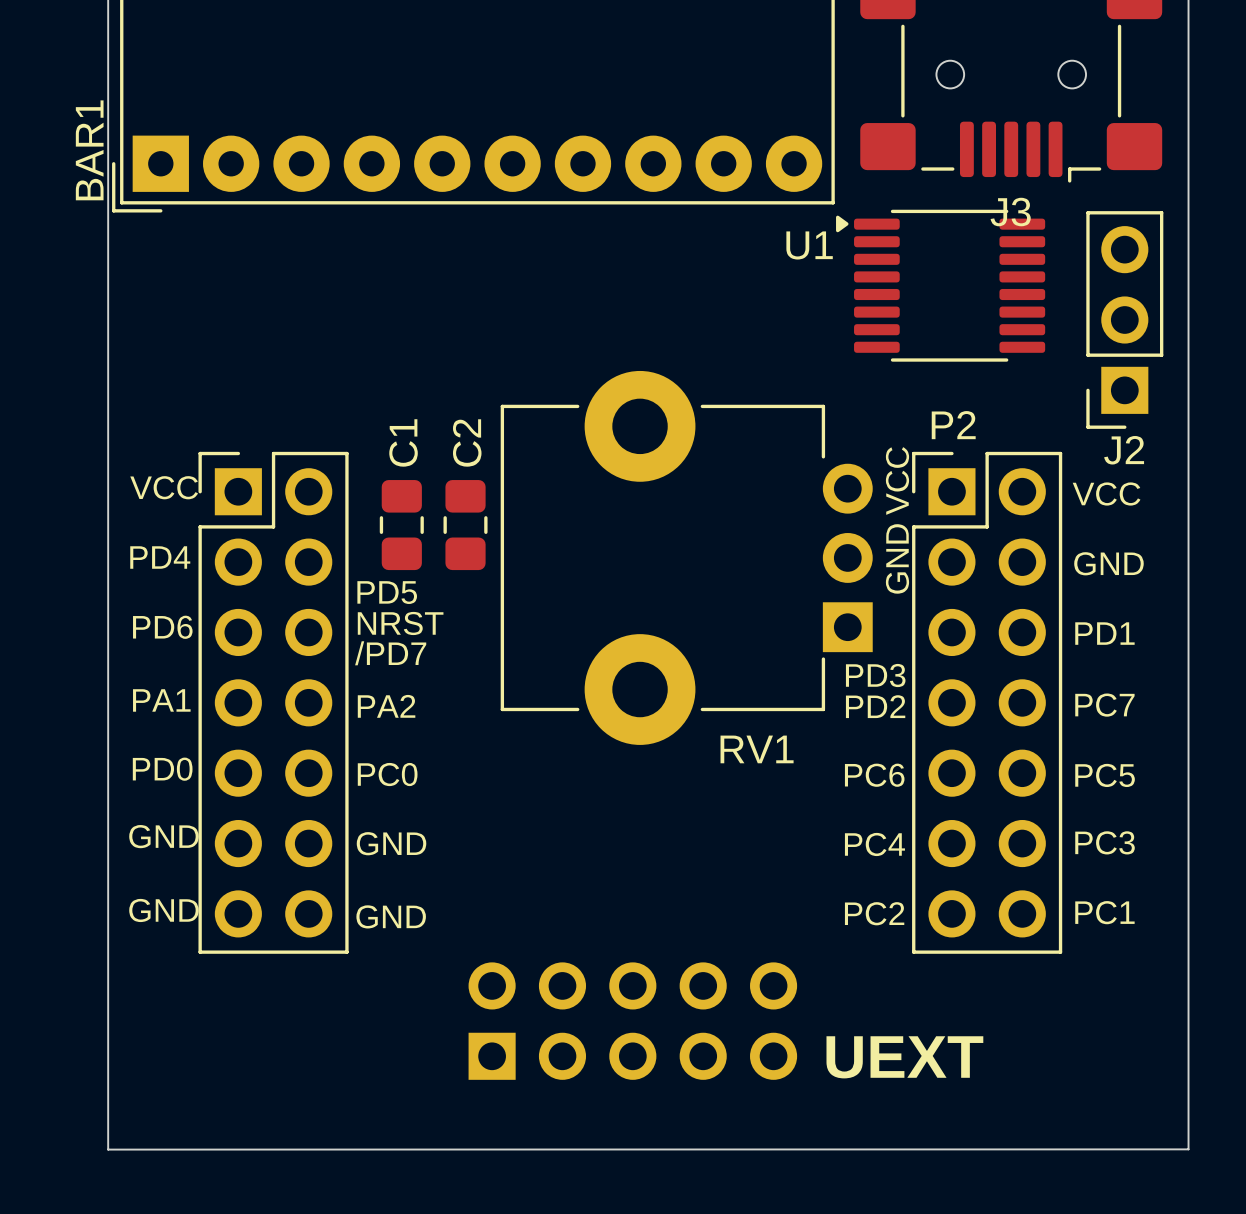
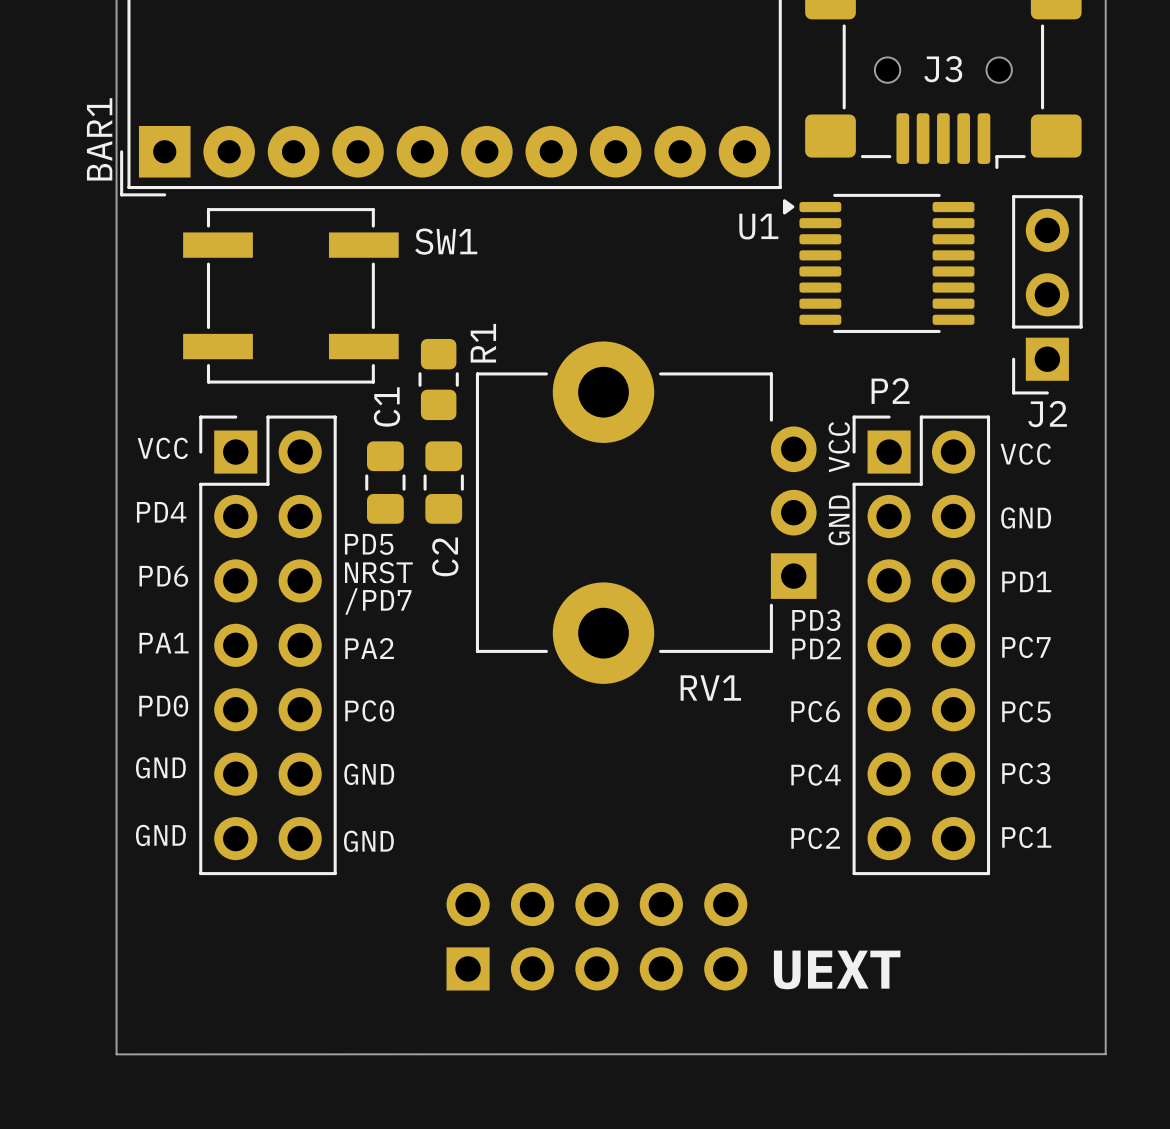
J3 name position: J3 (1010, 212) -> J3 (943, 69)
SW1: none -> (290, 295)
R1: none -> (438, 379)
C2 name position: C2 (467, 442) -> C2 (445, 556)

